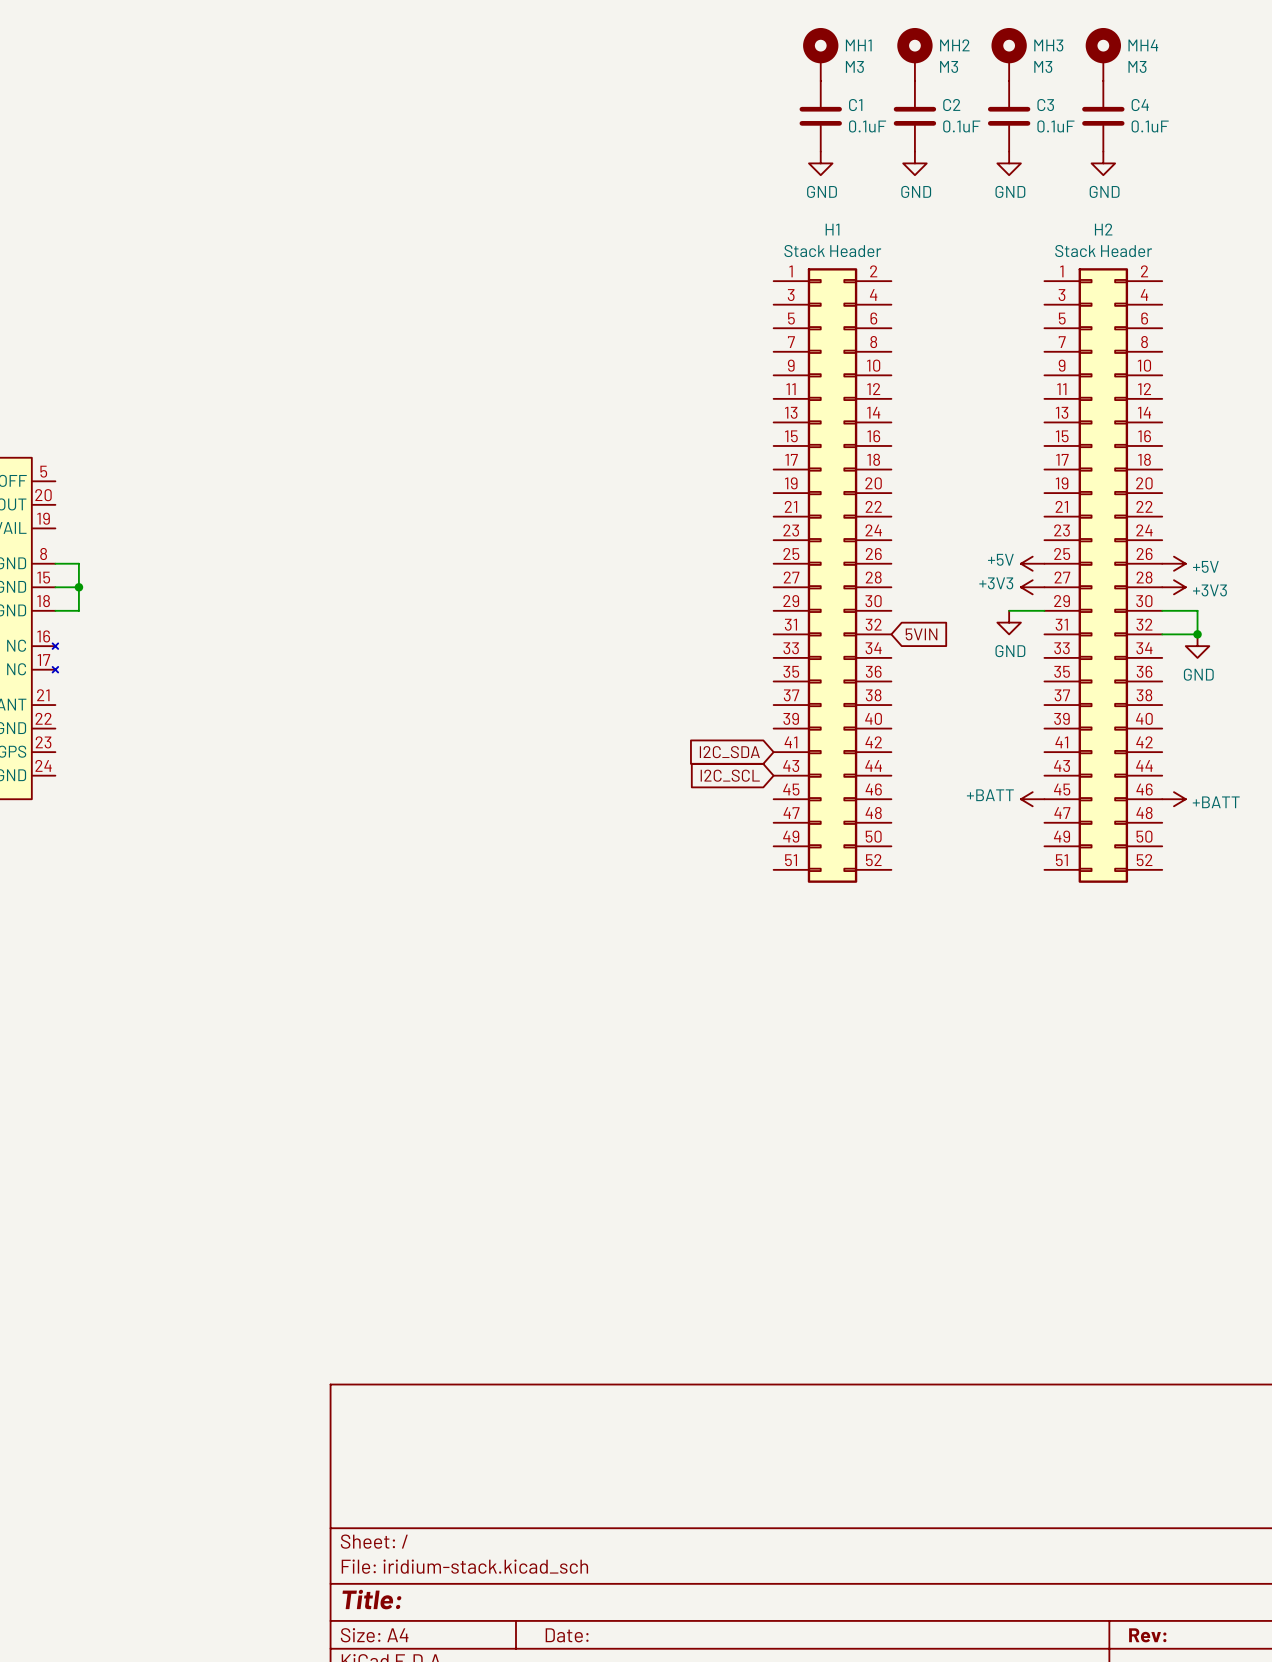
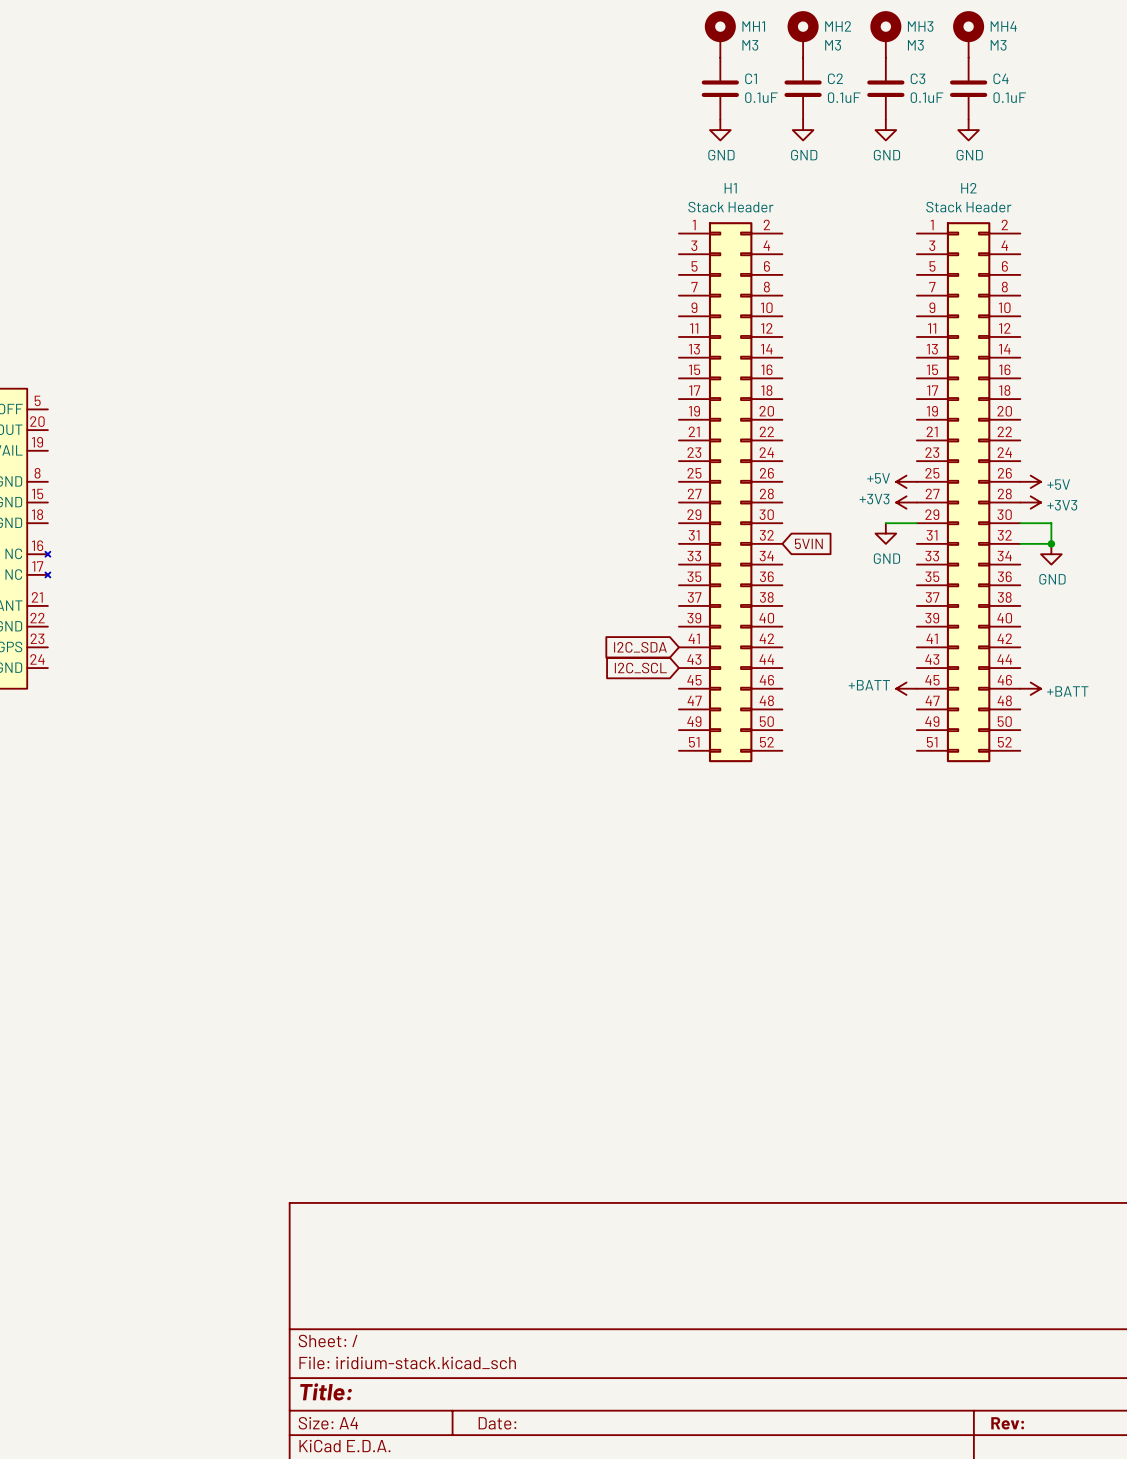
wire: (55, 563) (78, 563) (78, 610) (55, 610) -> none
wire: (55, 587) (78, 587) -> none
junction: (78, 587) -> none

